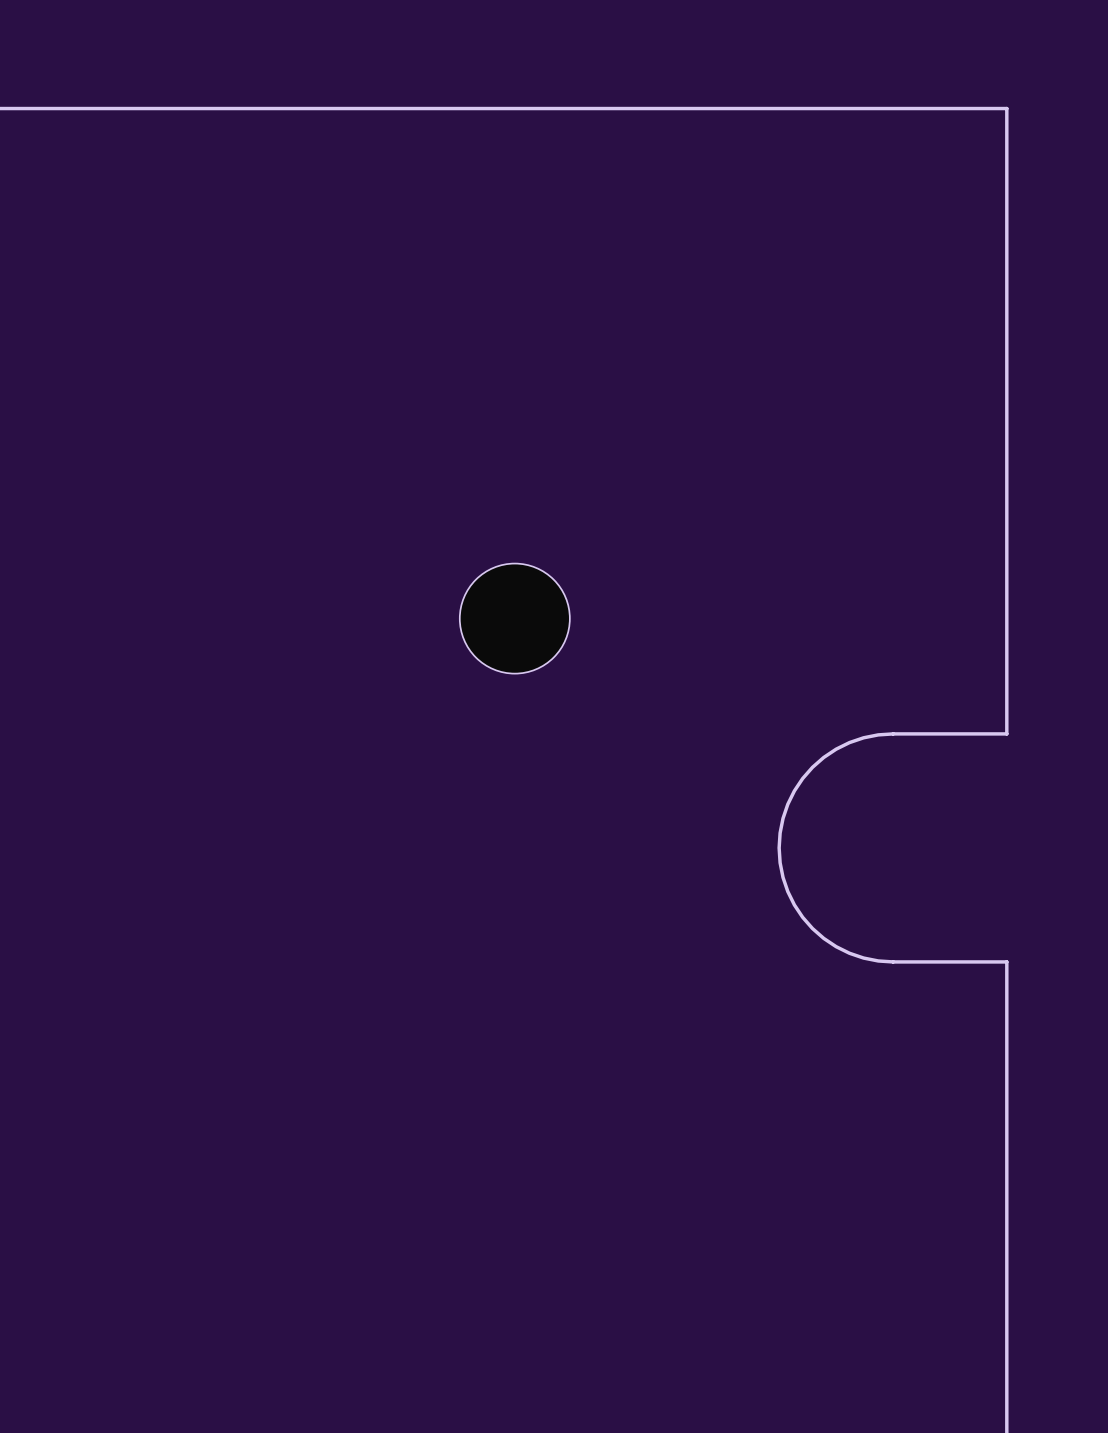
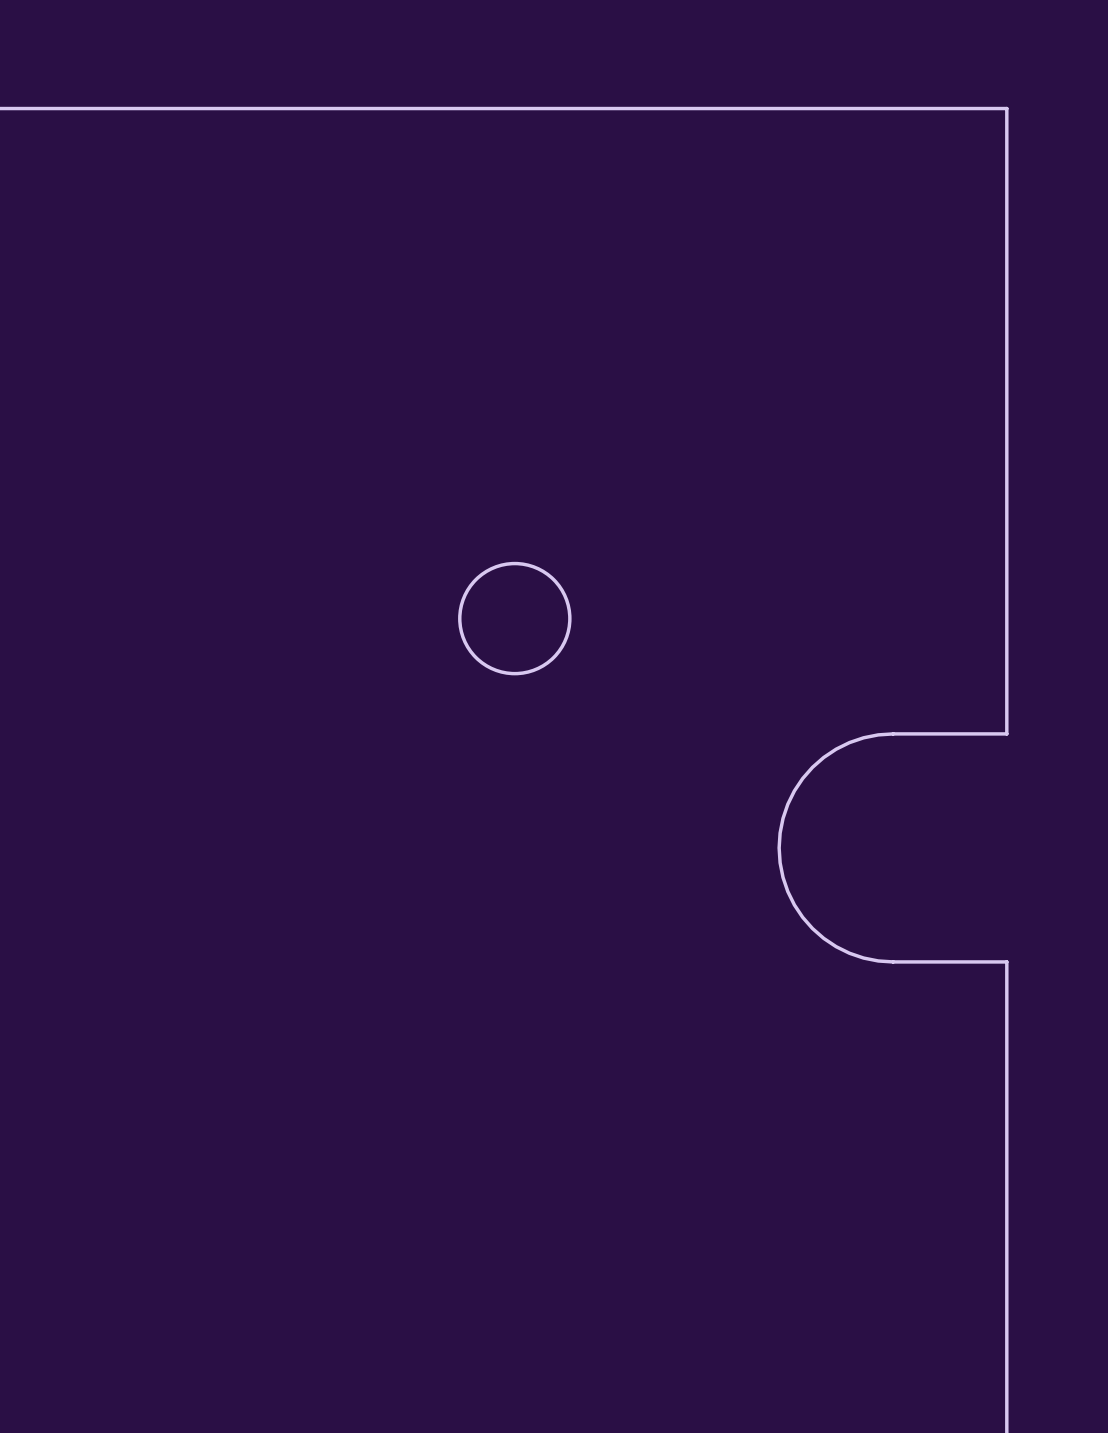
round board edge: none -> [458, 561, 572, 676]
part: (514, 618) -> none

